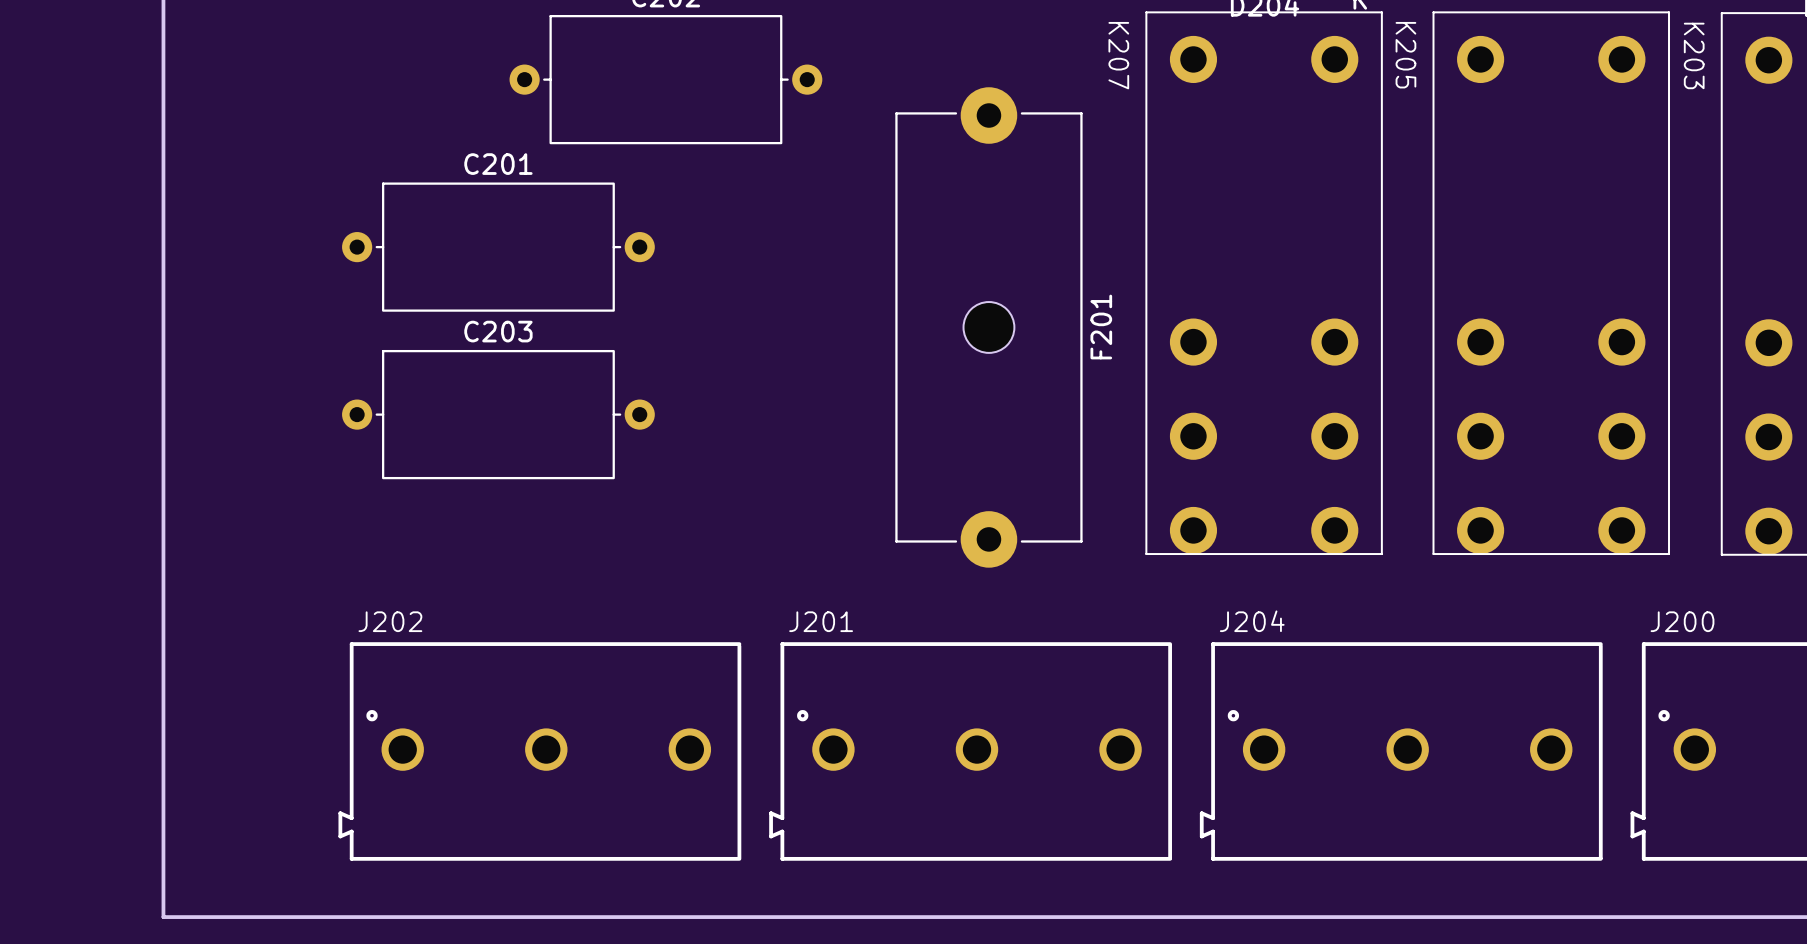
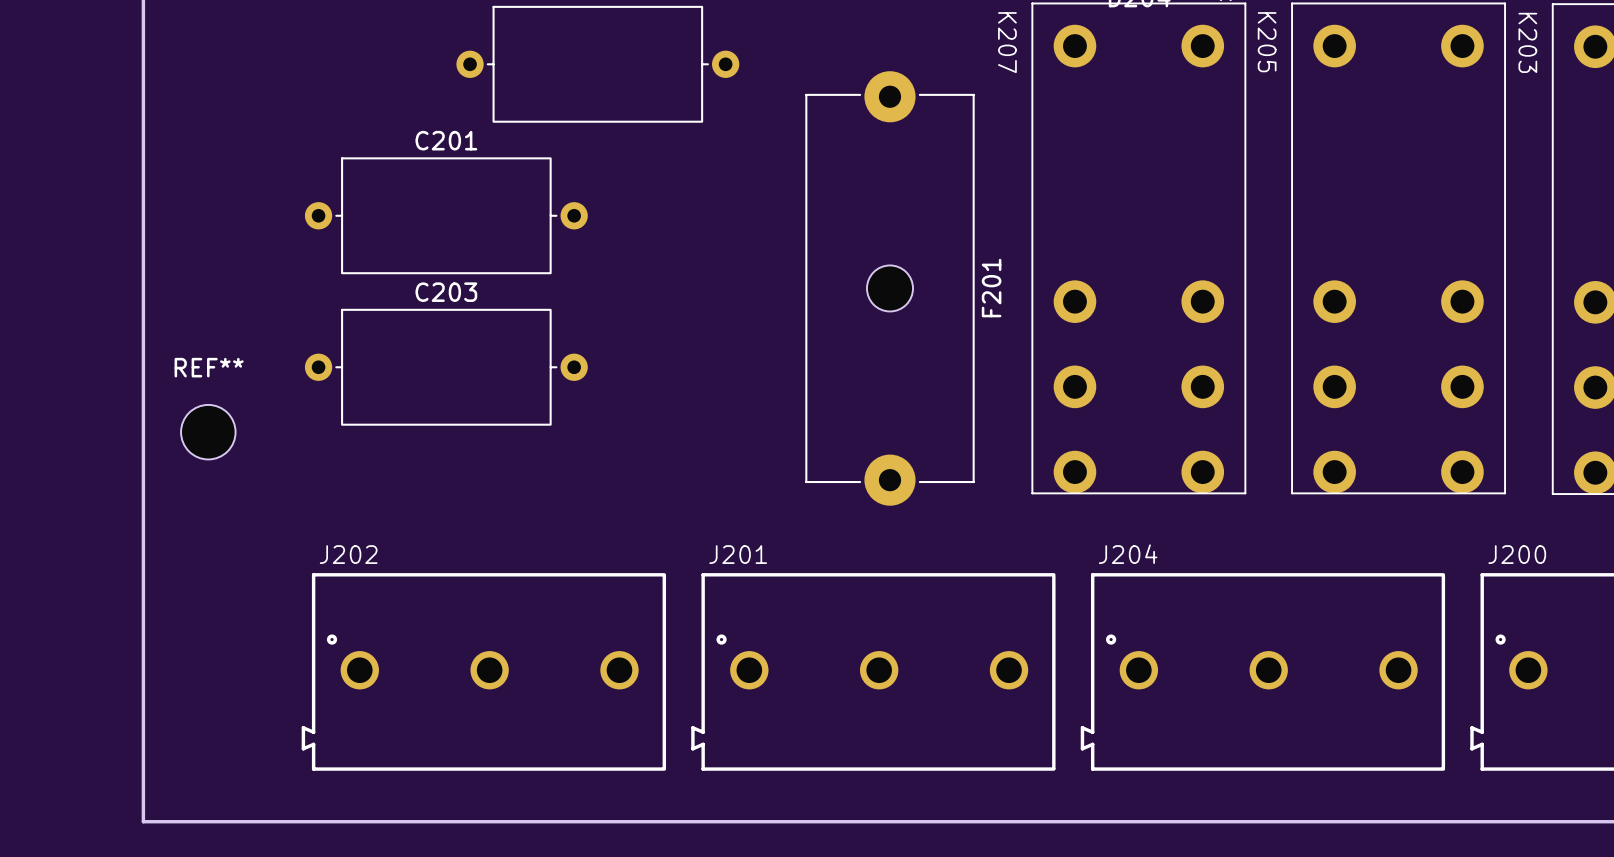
REF**: none -> (208, 432)

